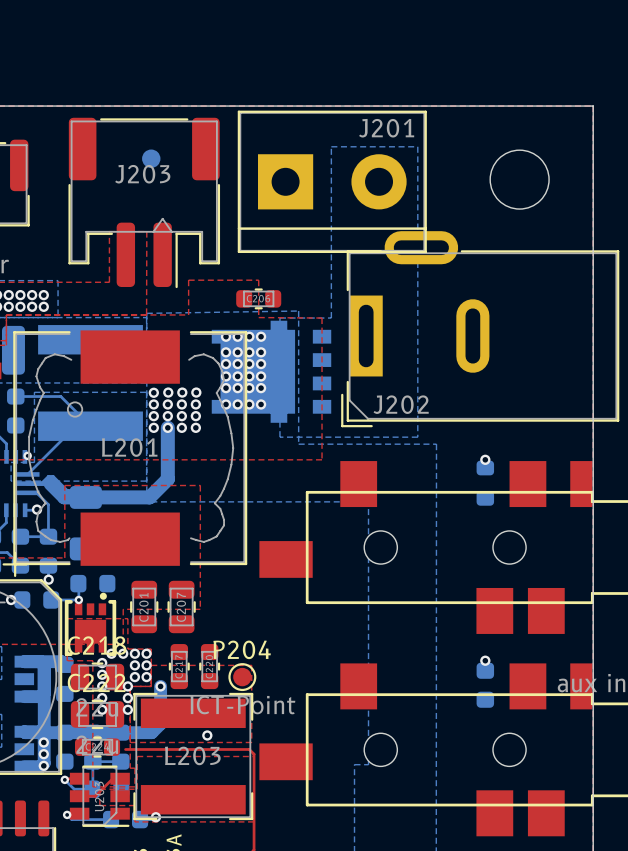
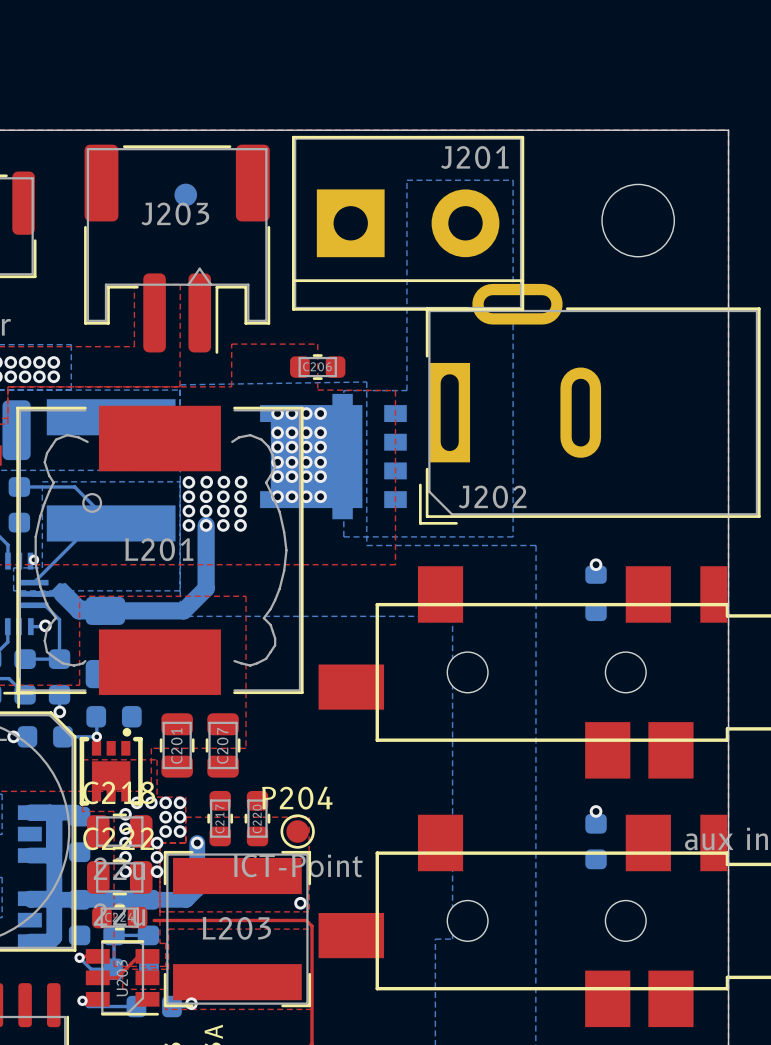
via position: (207, 735) -> (300, 903)
via: (43, 742) -> none
via: (43, 754) -> none
via: (43, 765) -> none

